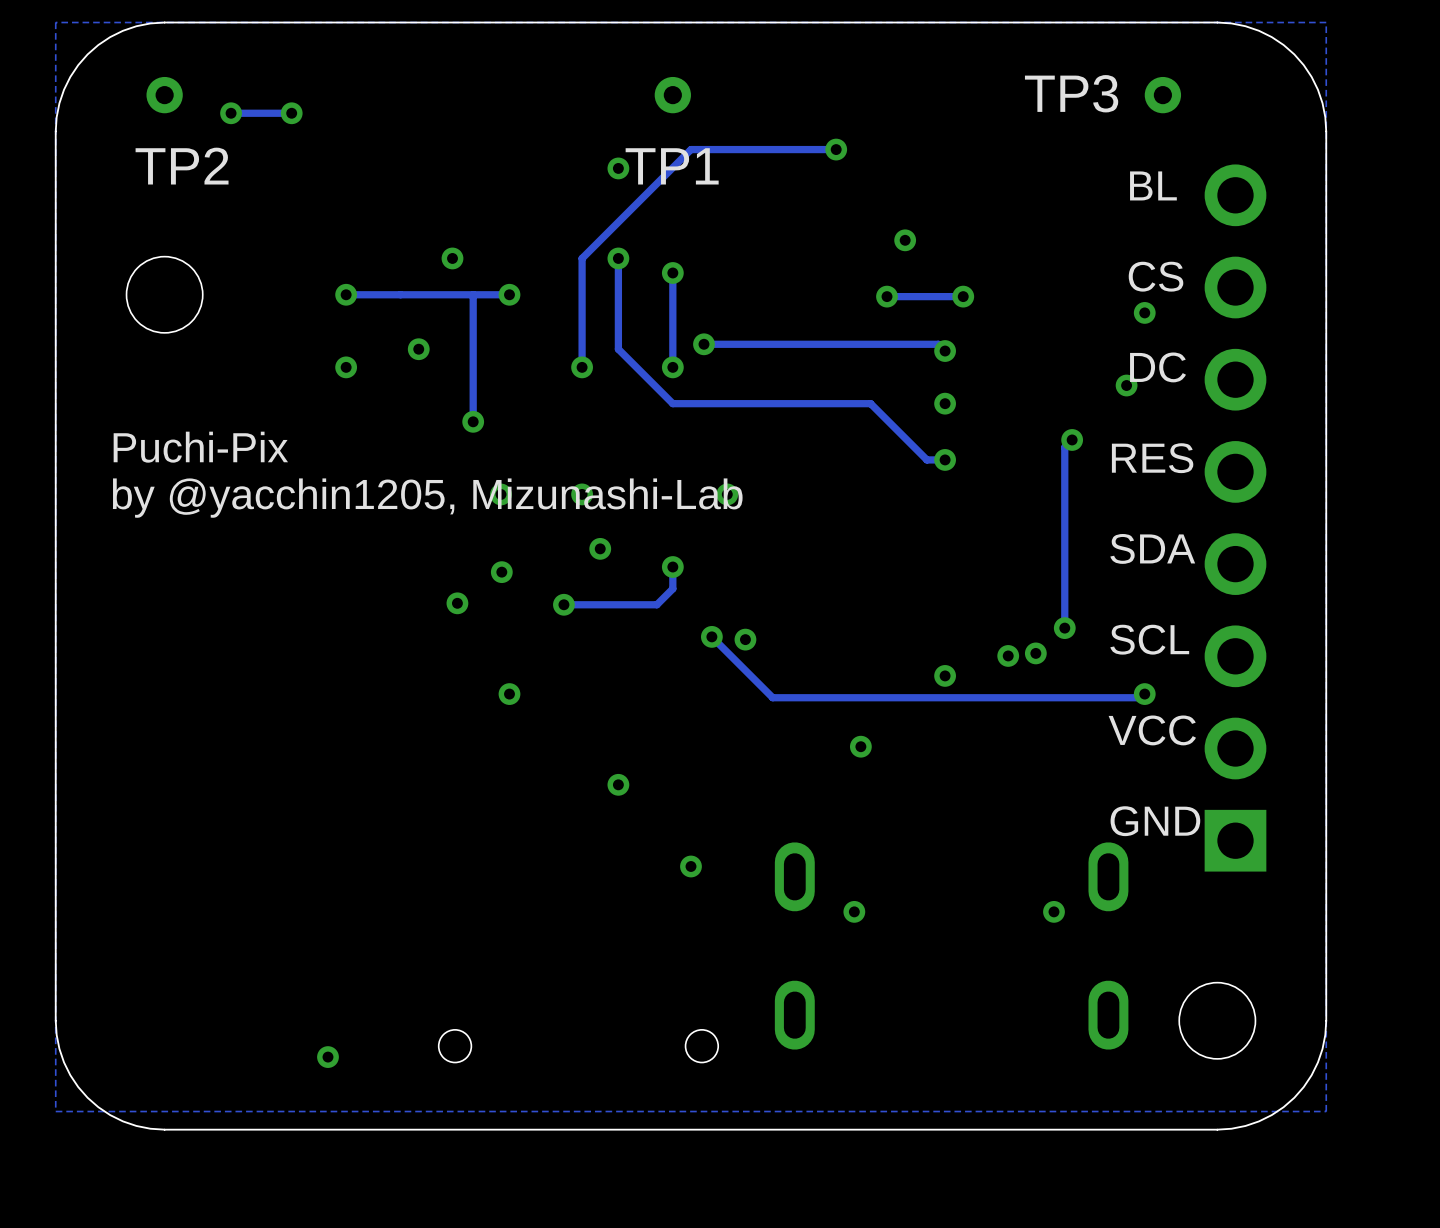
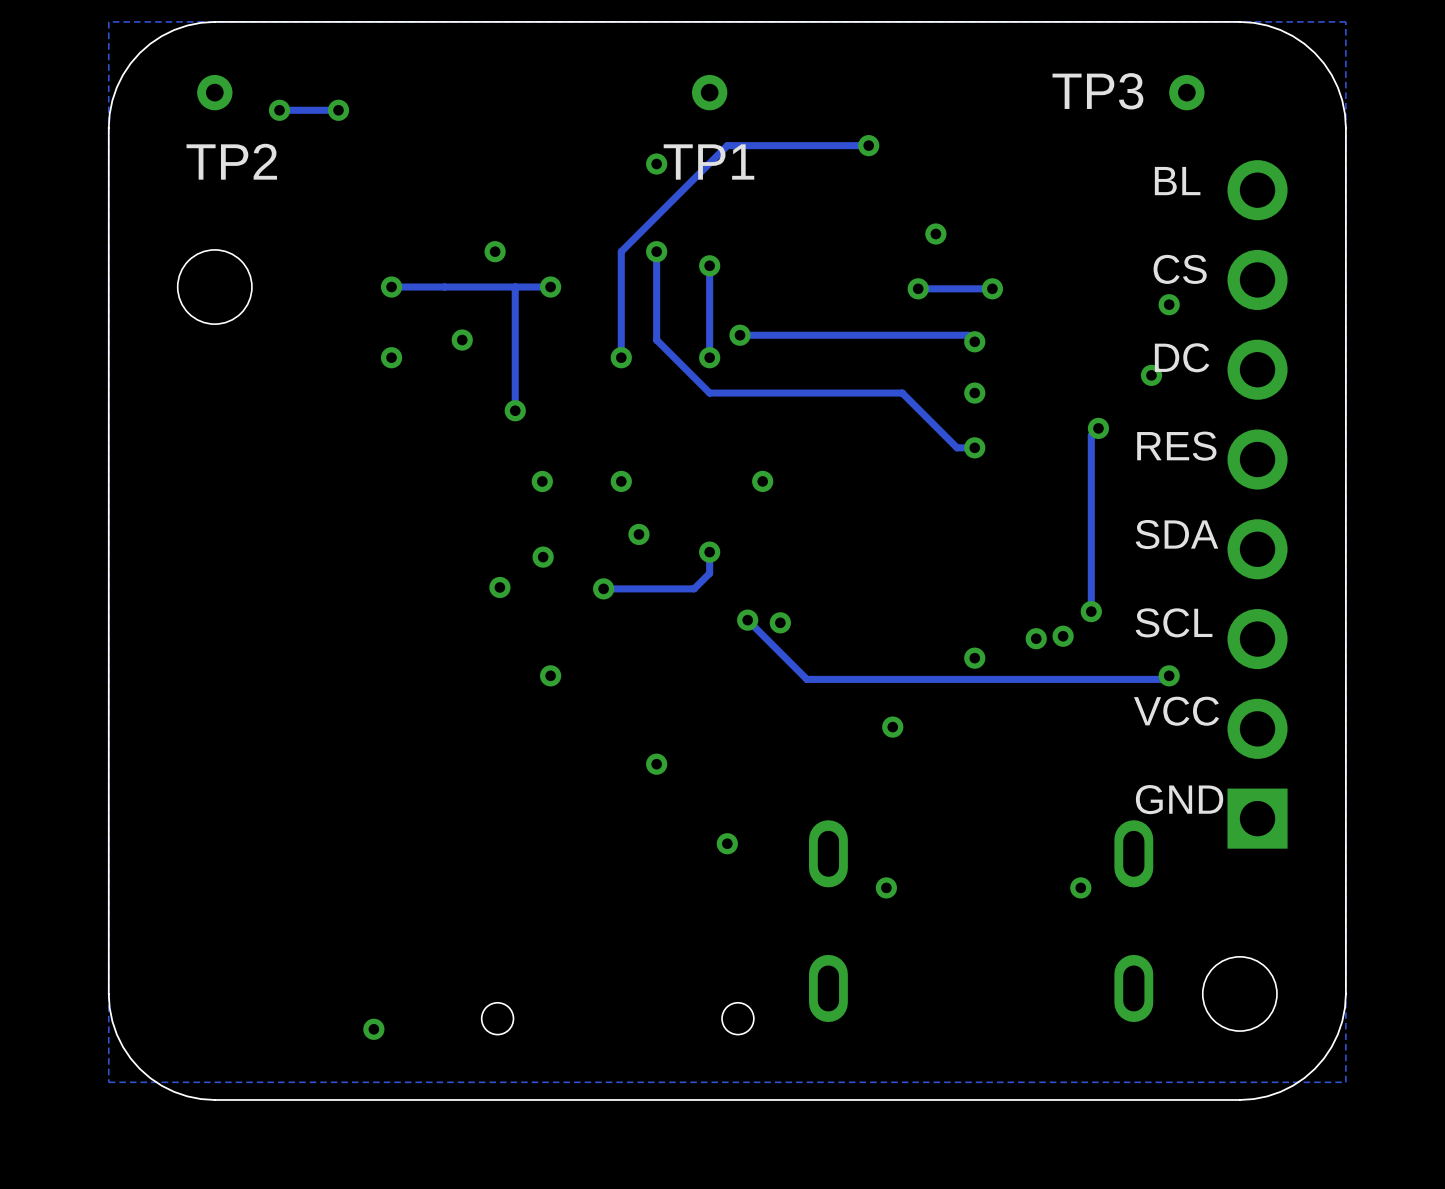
text: Puchi-Pix (200, 447) -> none
text: by @yacchin1205, Mizunashi-Lab (427, 498) -> none

